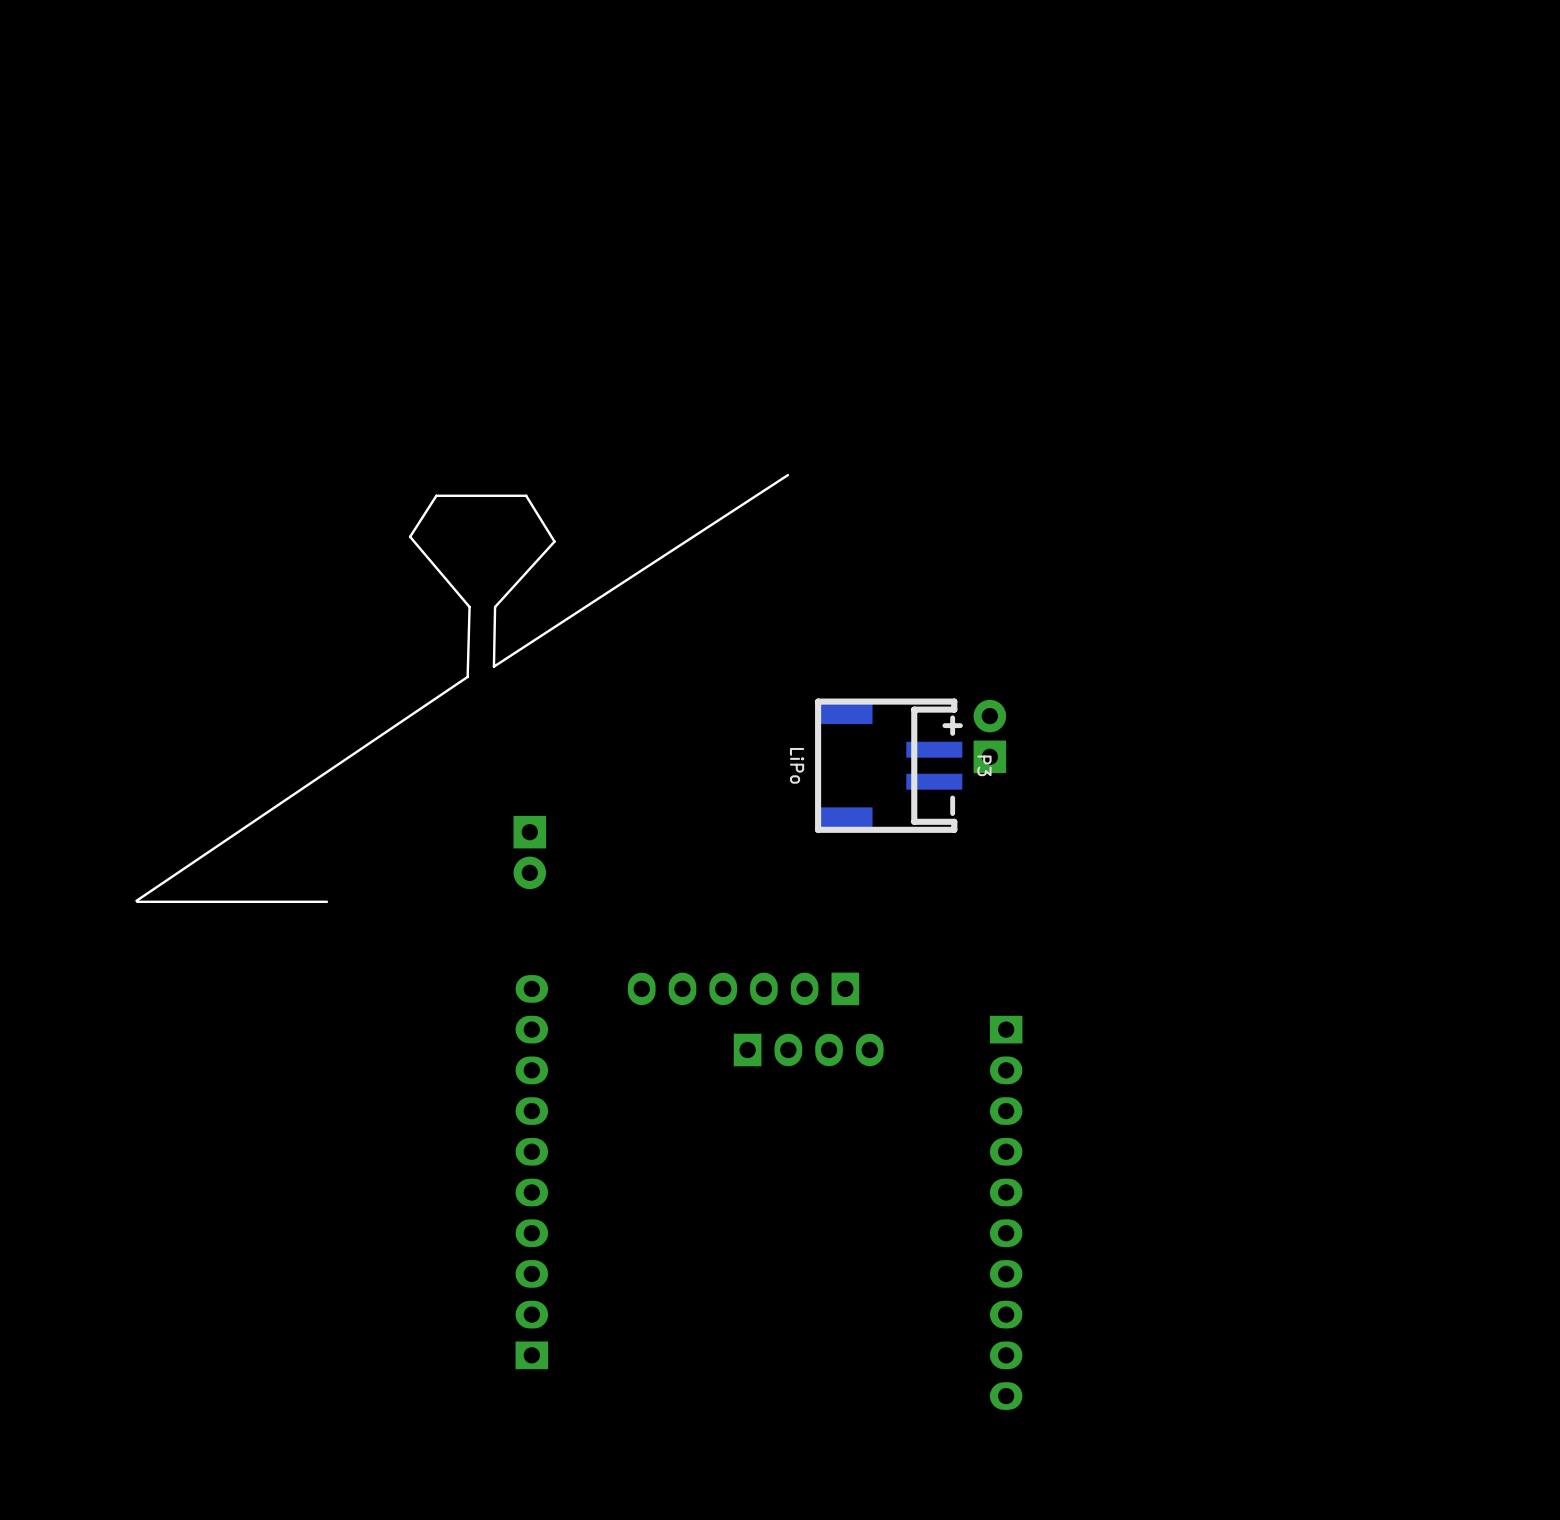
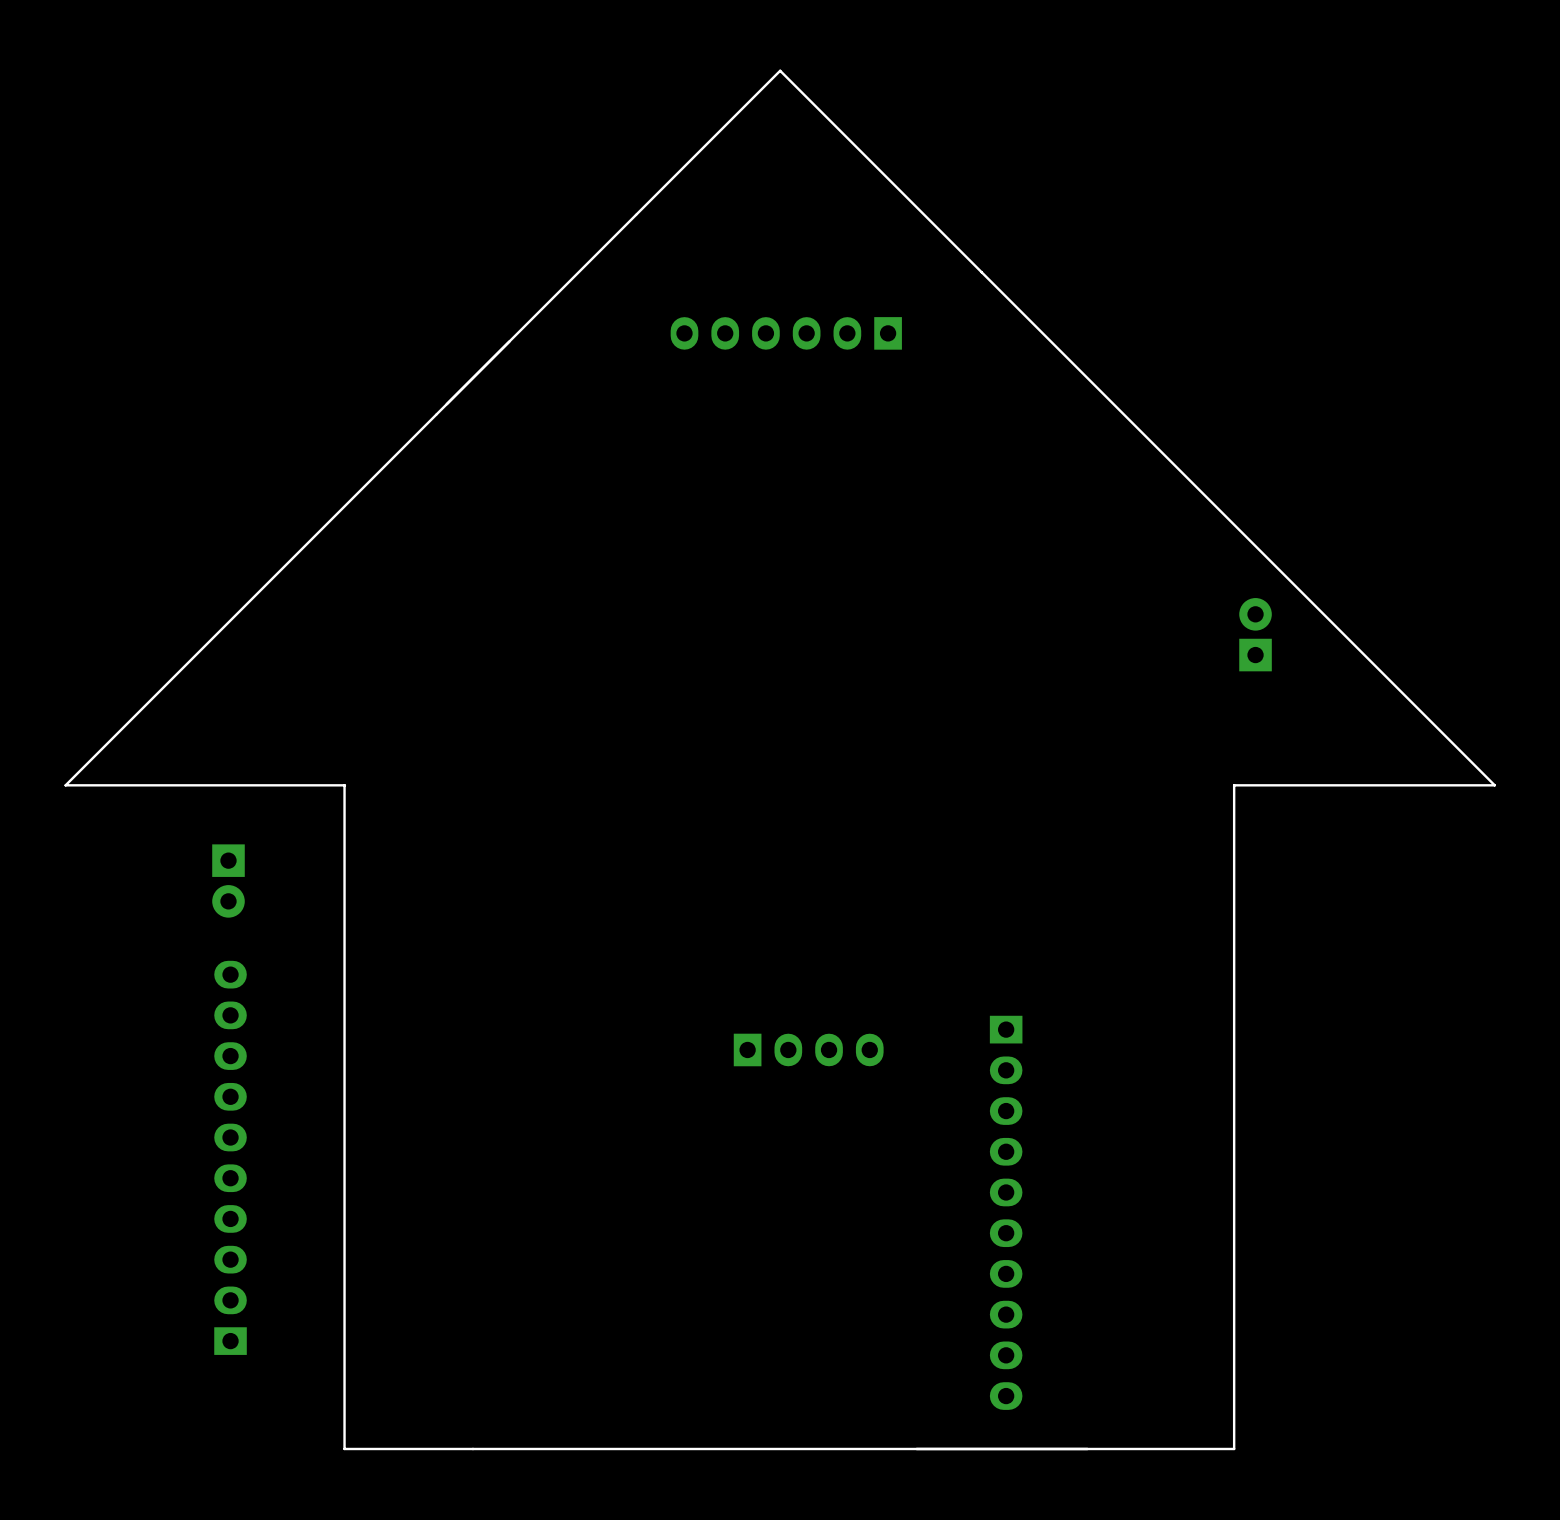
part: none -> (786, 333)
board edge: (787, 475) (493, 666) (495, 607) (554, 541) (526, 495) (436, 495) (410, 536) (469, 607) (467, 676) (136, 900) -> none
part position: (989, 736) -> (1255, 634)
P3: LiPo (888, 765) -> none
board edge: none -> (344, 785) (65, 785) (780, 70) (1494, 785) (1234, 785) (1234, 1448) (344, 1448) (344, 785)
part position: (529, 852) -> (228, 881)
board edge: (326, 901) (137, 901) -> none
part: (743, 988) -> none
part position: (531, 1172) -> (230, 1157)

